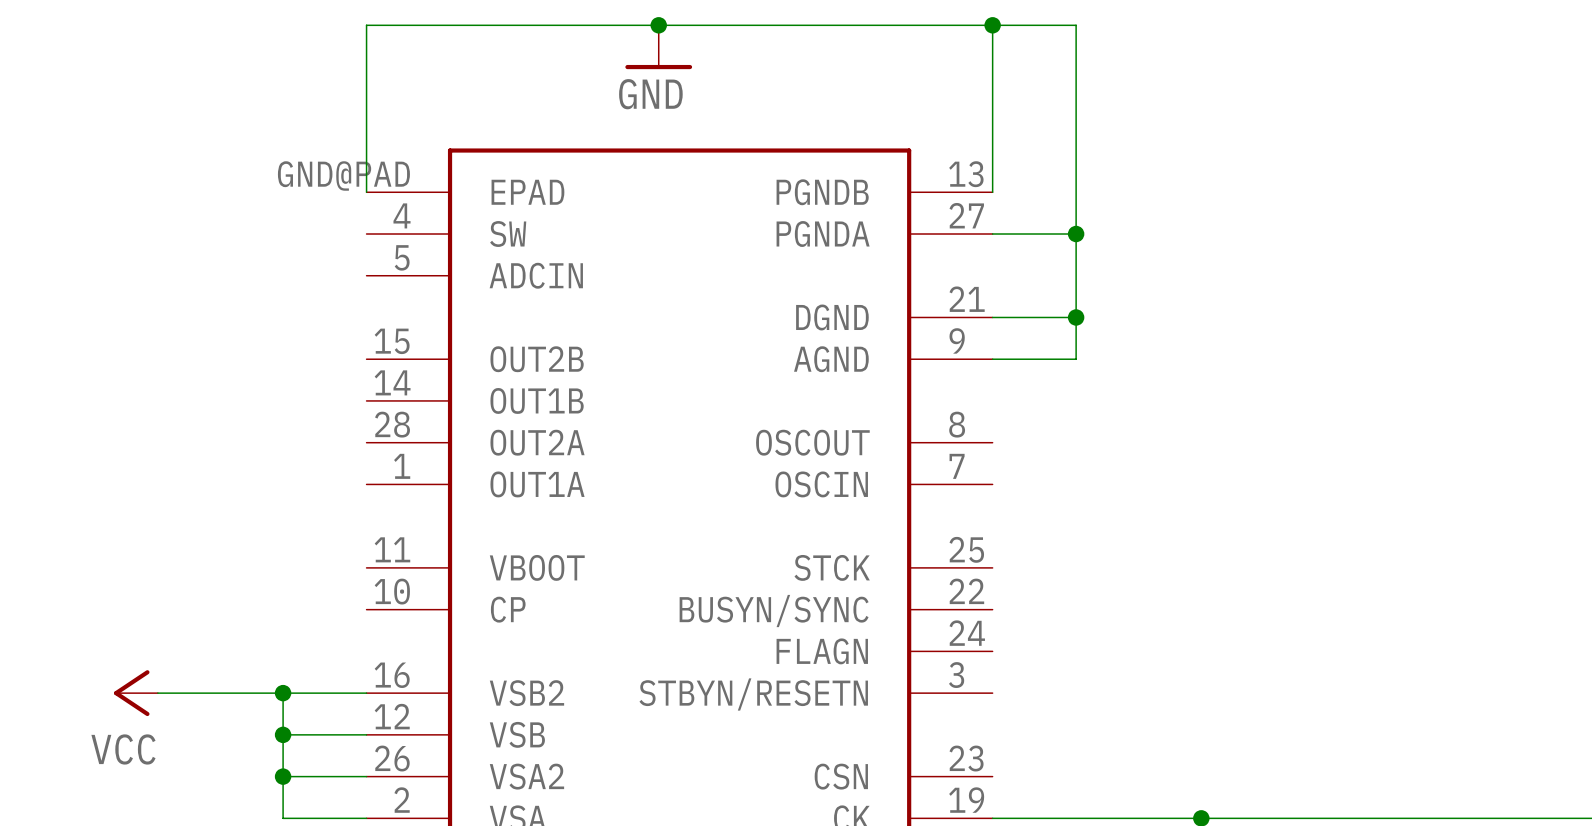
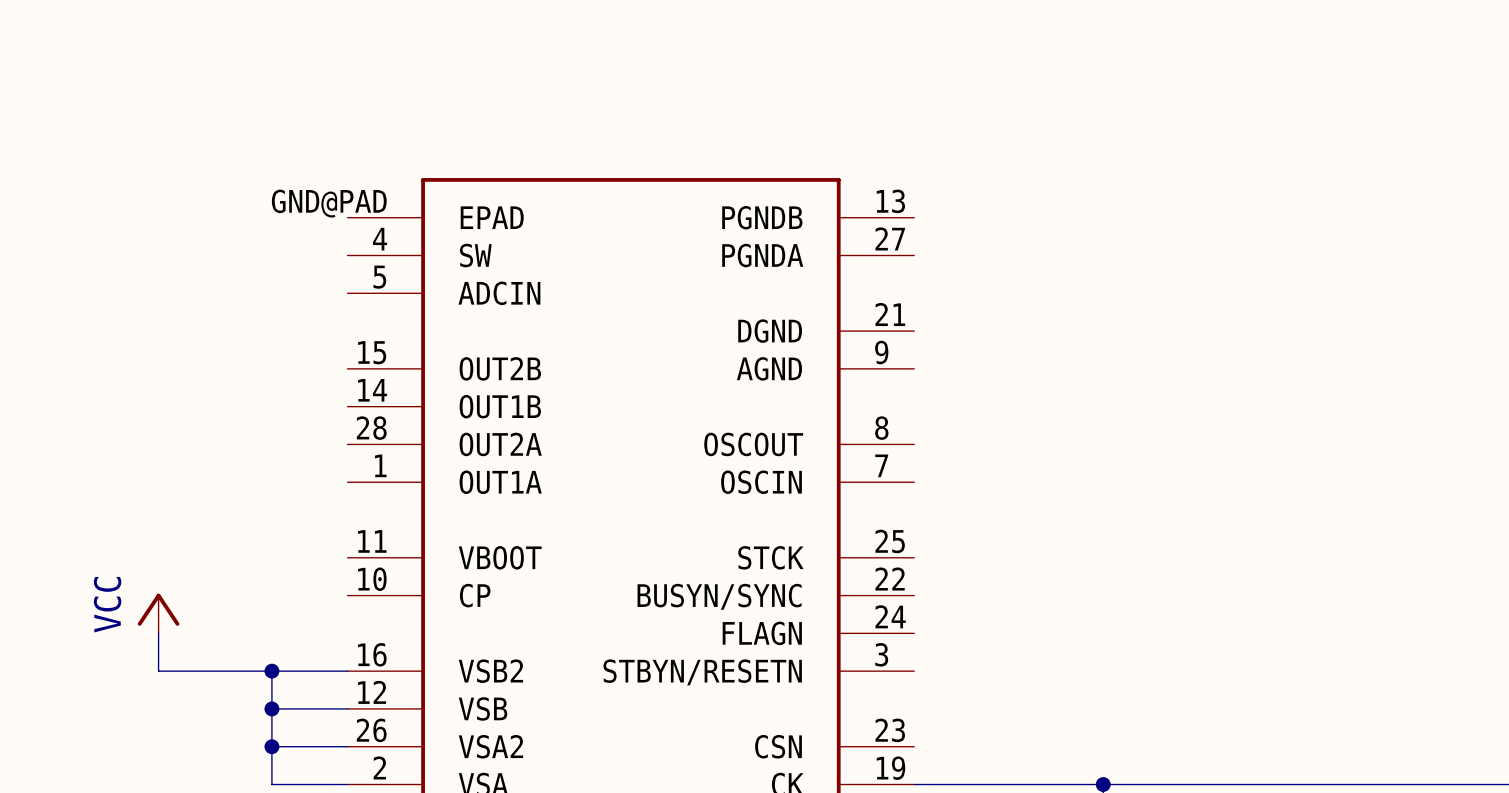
junction: (658, 25) -> none
wire: (992, 25) (992, 192) -> none
junction: (992, 25) -> none
power symbol: GND (658, 47) -> none
wire: (366, 192) (366, 25) (1076, 25) (1076, 359) (992, 359) -> none
wire: (992, 234) (1076, 234) -> none
junction: (1076, 234) -> none
wire: (992, 317) (1076, 317) -> none
junction: (1076, 317) -> none
wire: none -> (158, 633) (158, 671)
power symbol rotation: 0° (131, 693) -> 90° clockwise (158, 609)
power symbol position: VCC (135, 693) -> VCC (158, 613)

